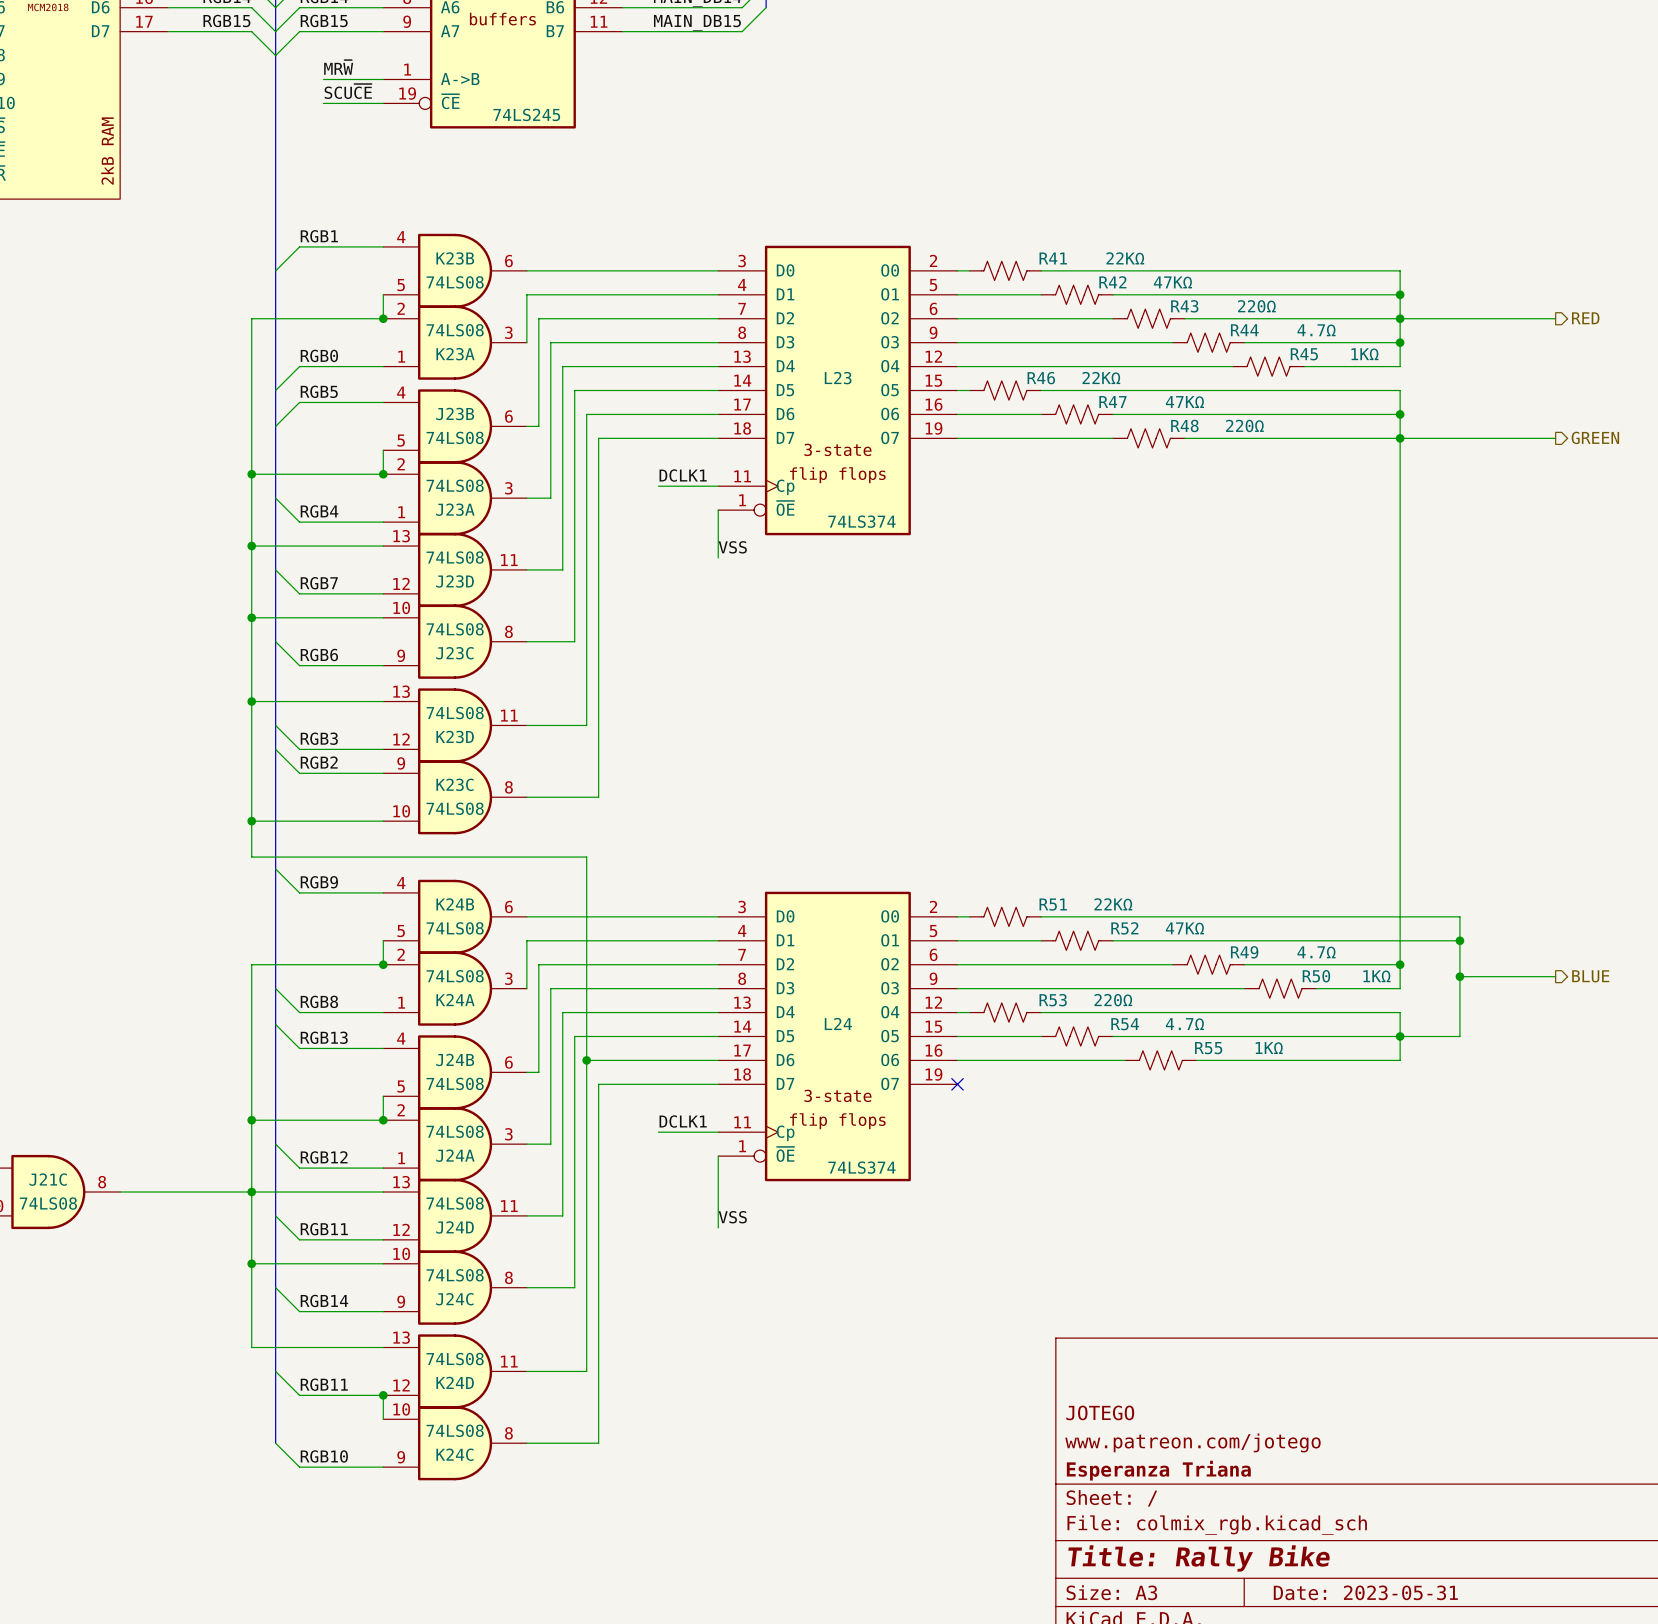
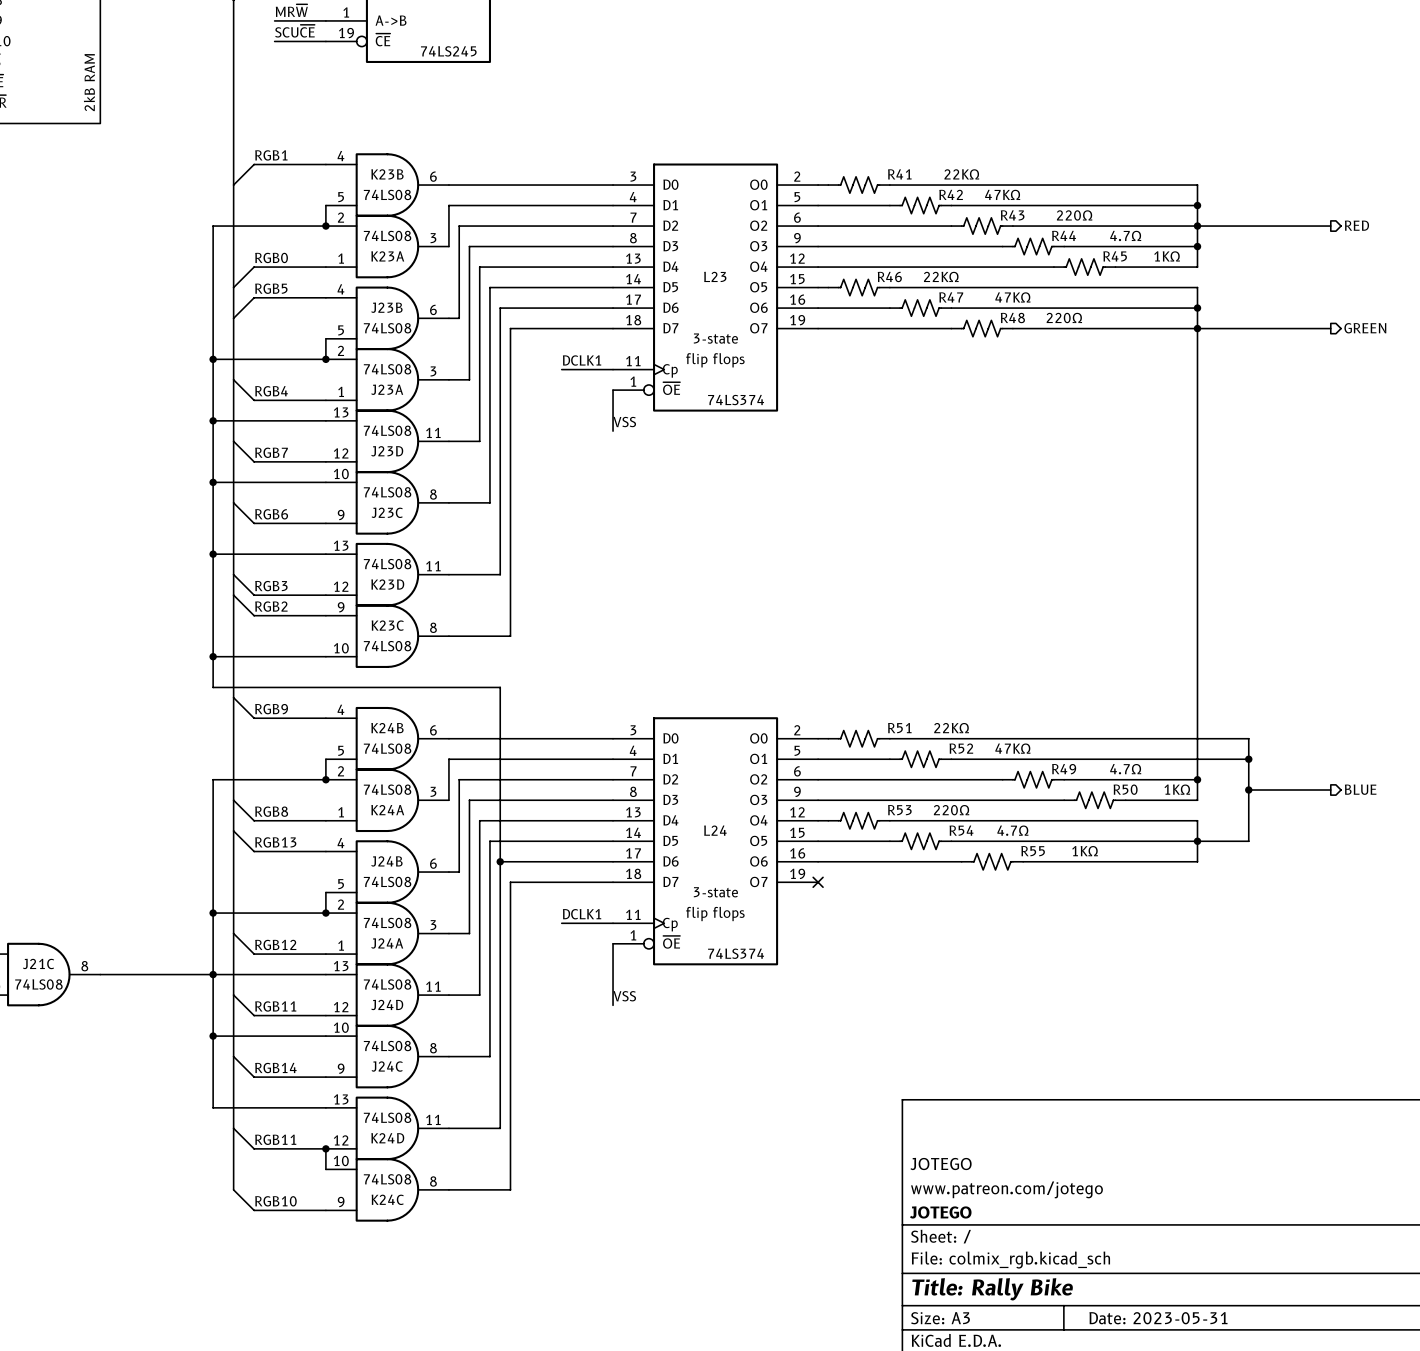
title block: Esperanza Triana (1158, 1470) -> JOTEGO (940, 1212)

